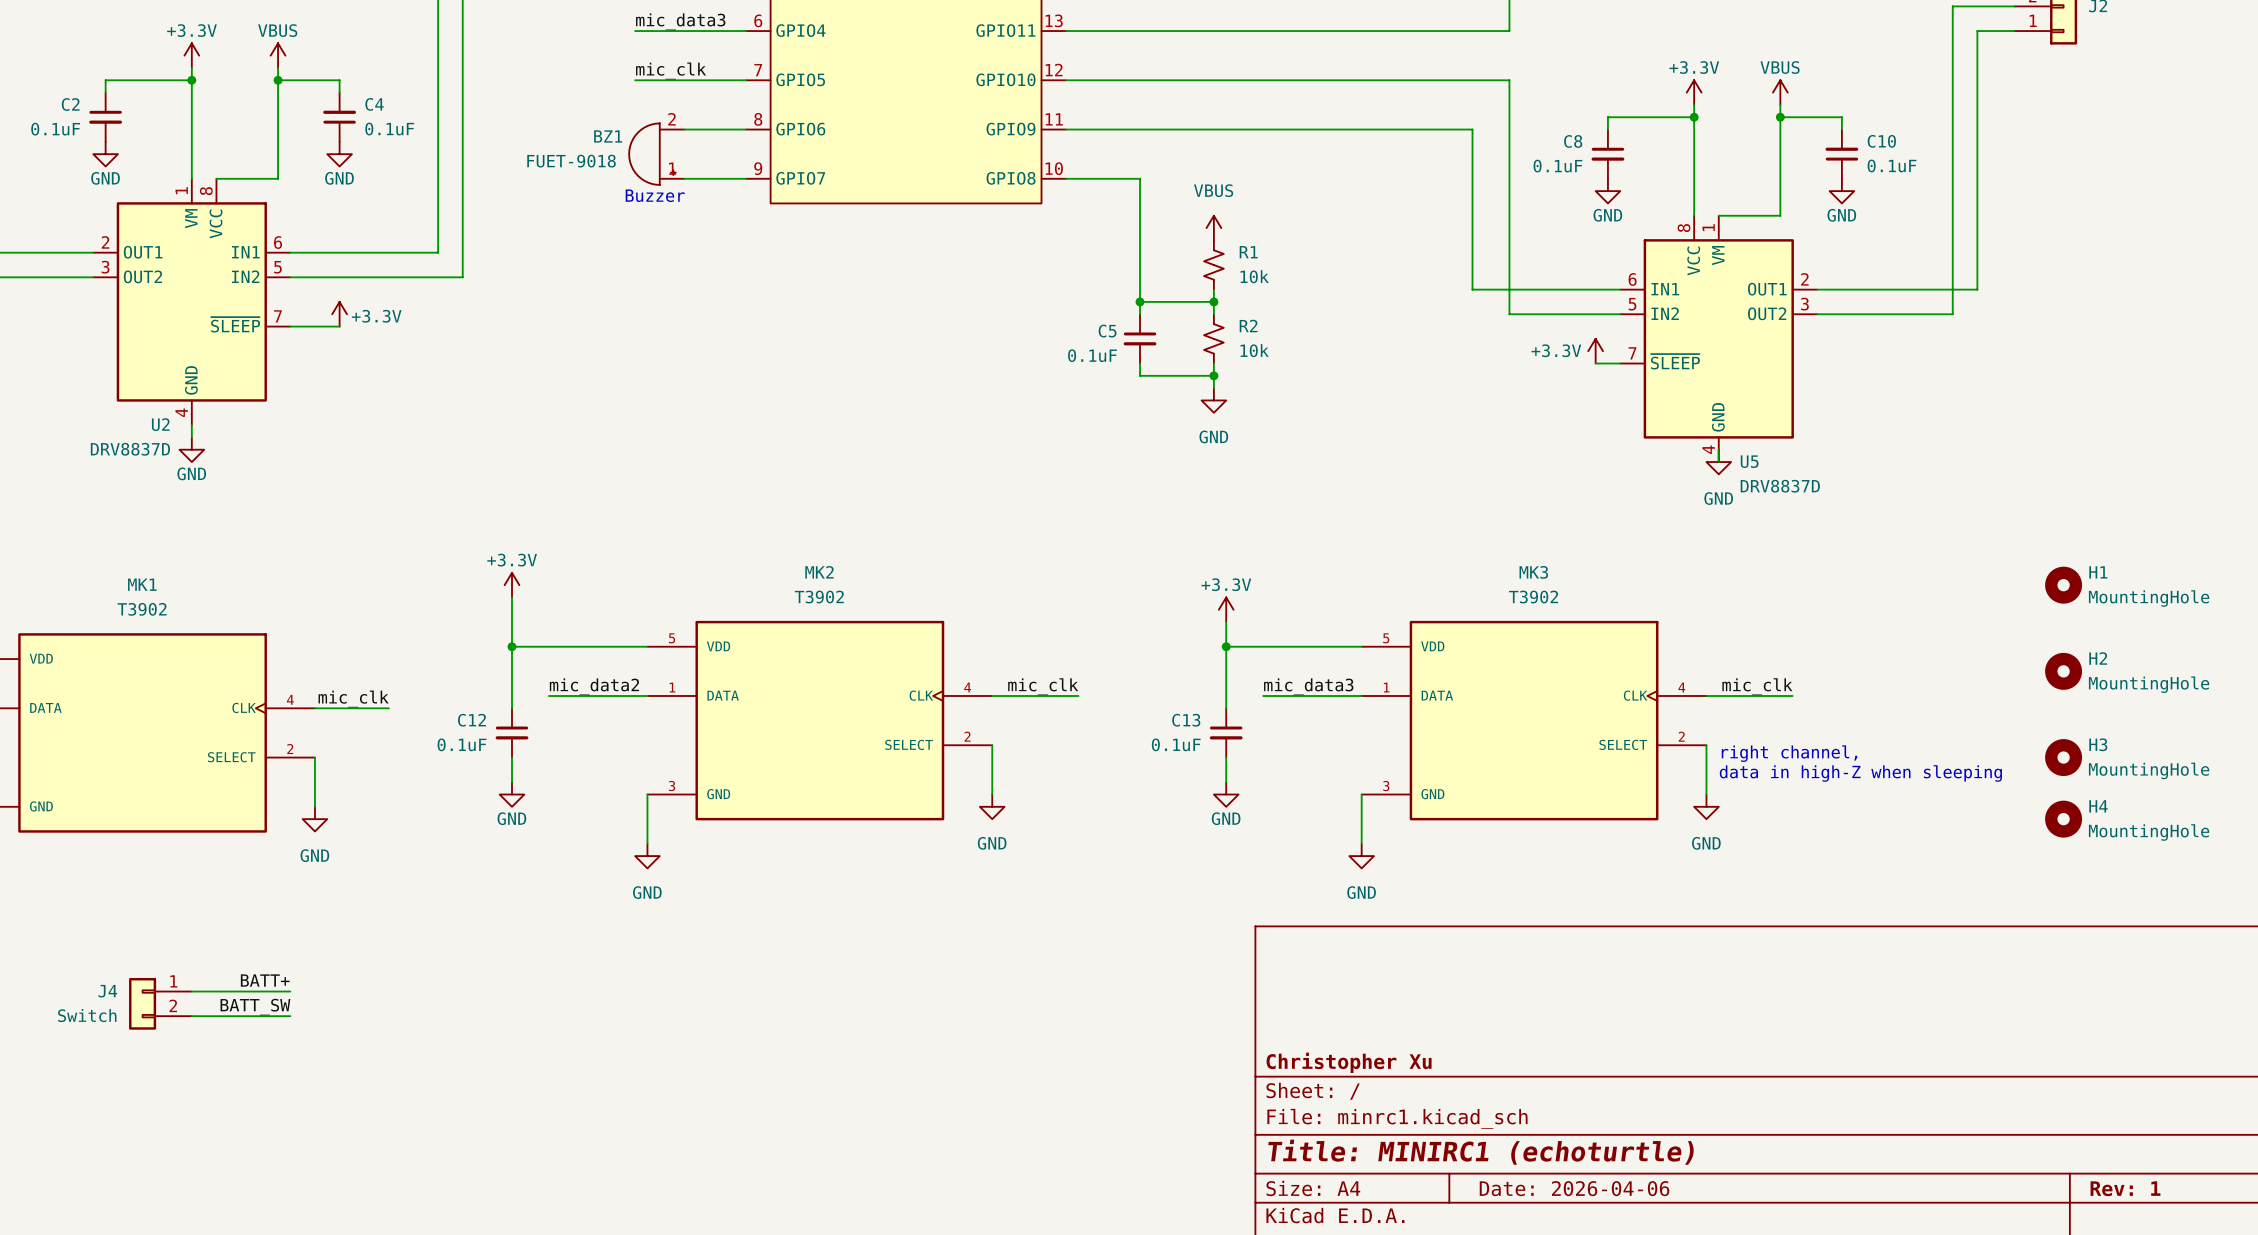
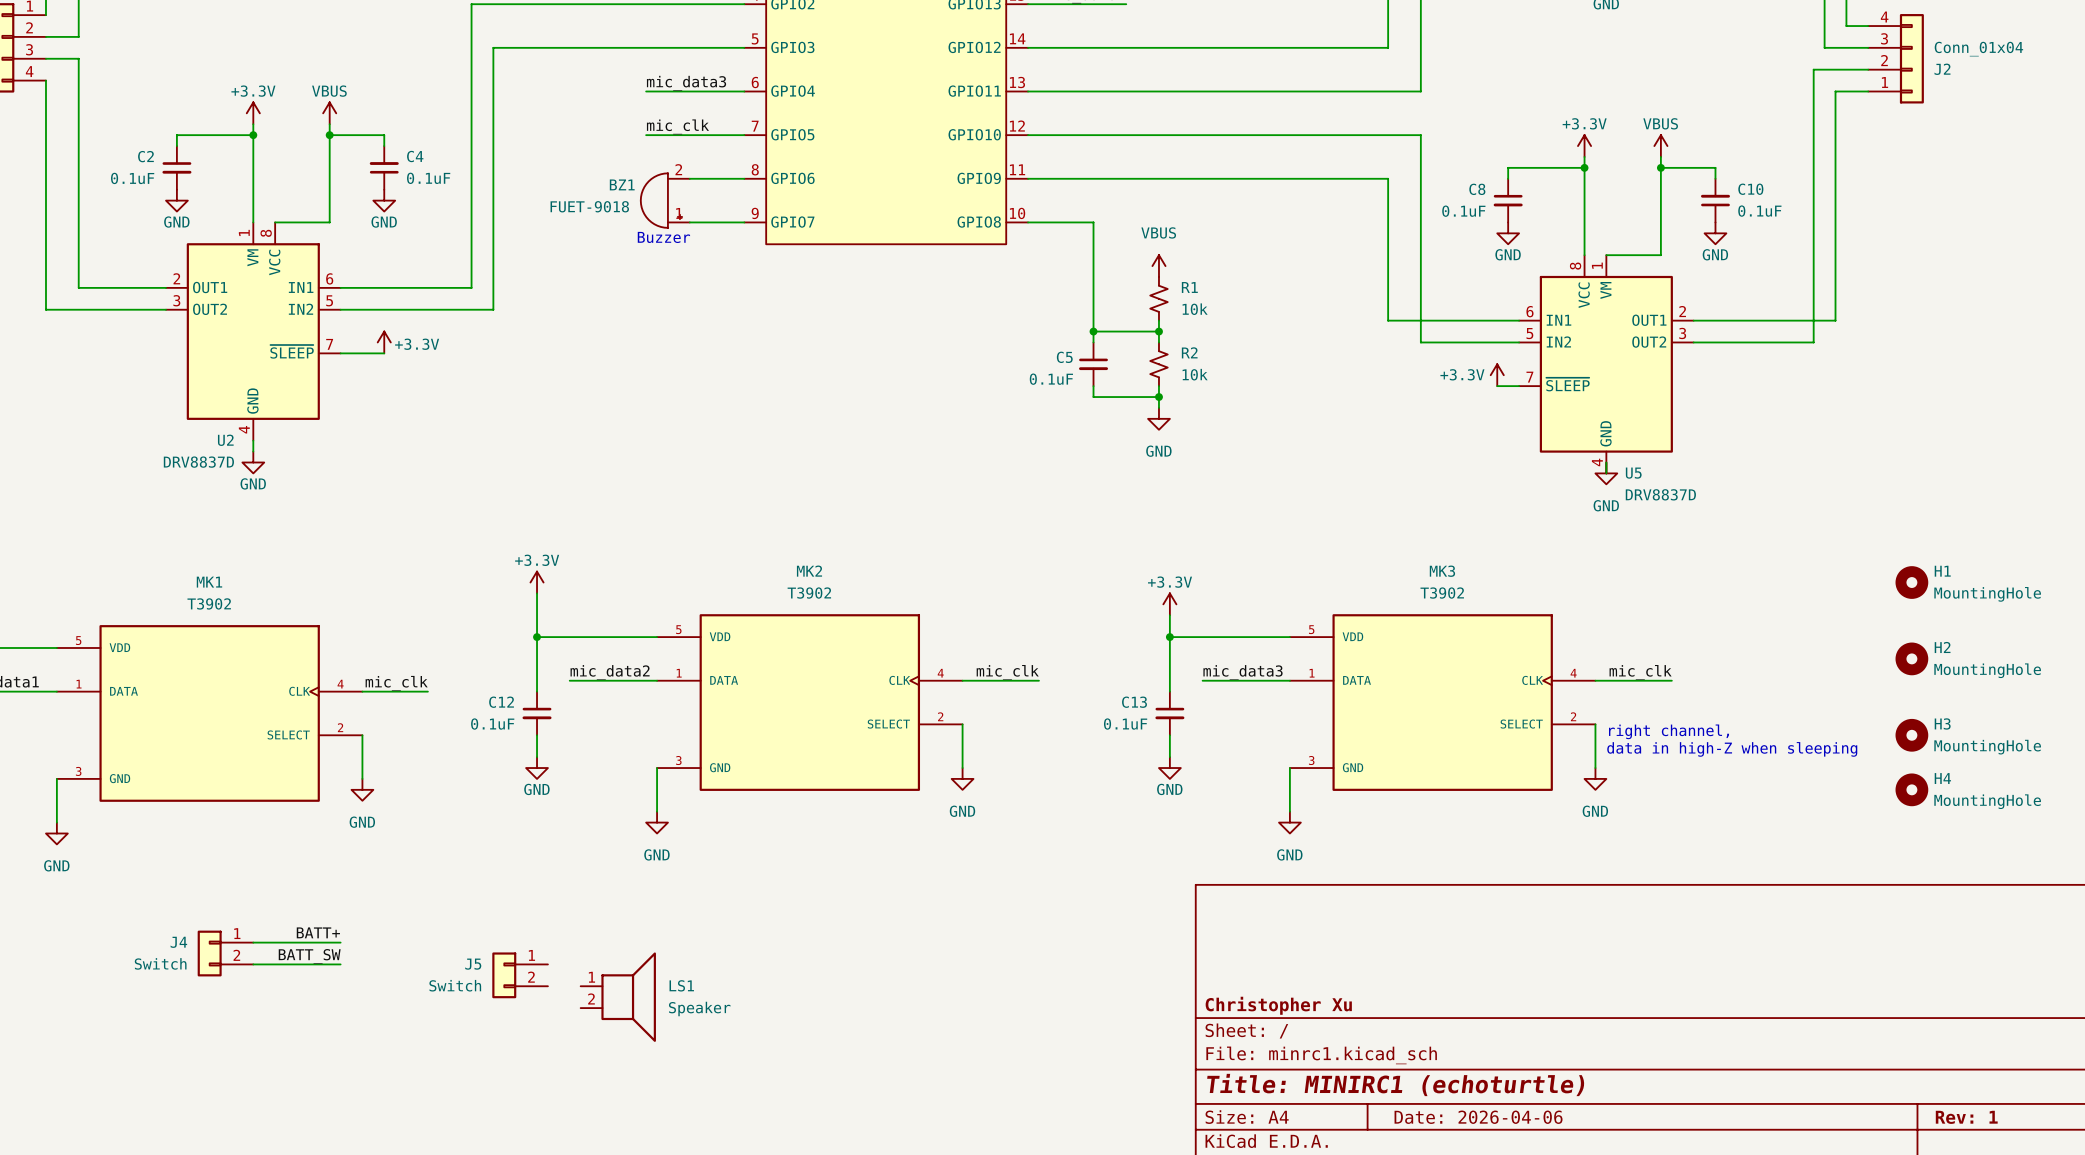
J5: none -> Switch (520, 975)
LS1: none -> Speaker (618, 997)

